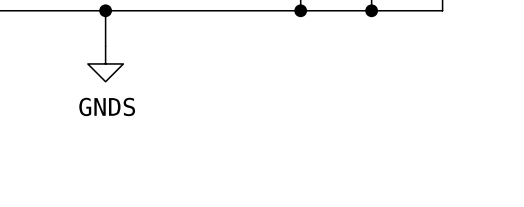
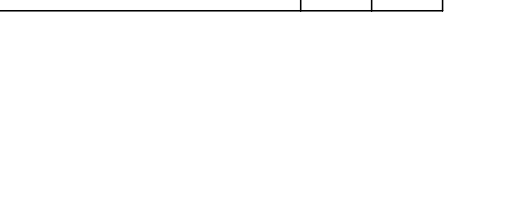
wire: (105, 10) (105, 46) -> none
junction: (105, 10) -> none
junction: (300, 10) -> none
junction: (371, 10) -> none
power symbol: GNDS (105, 63) -> none

